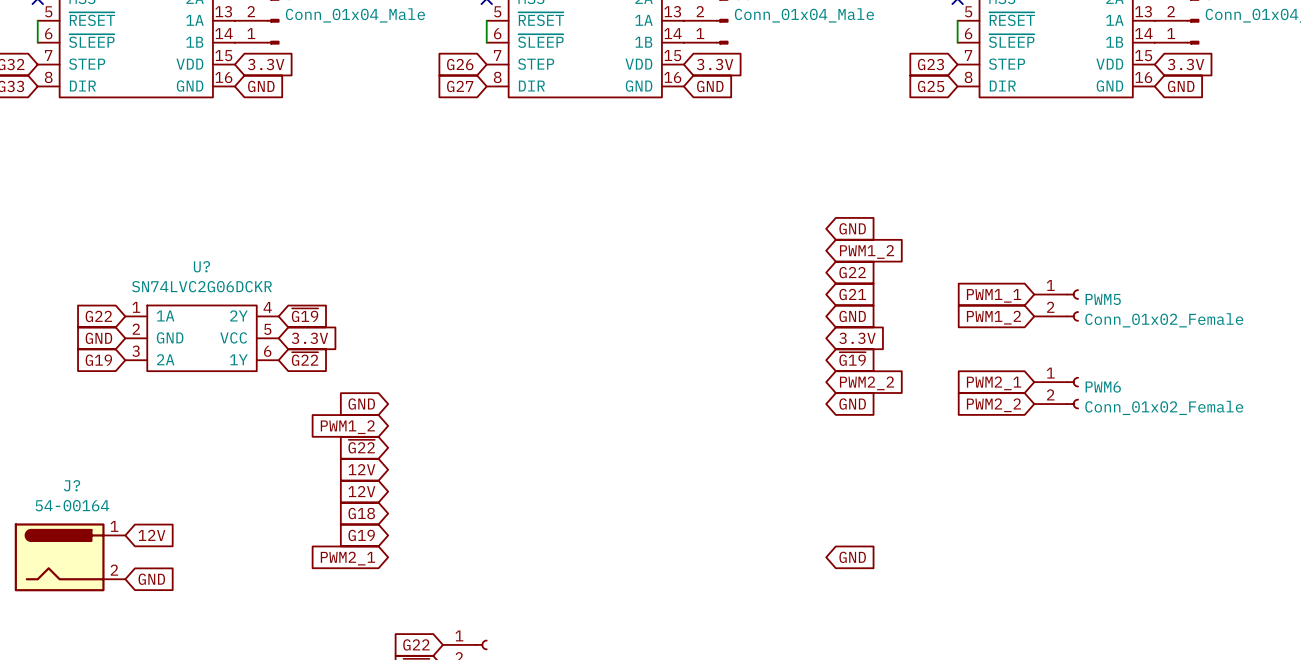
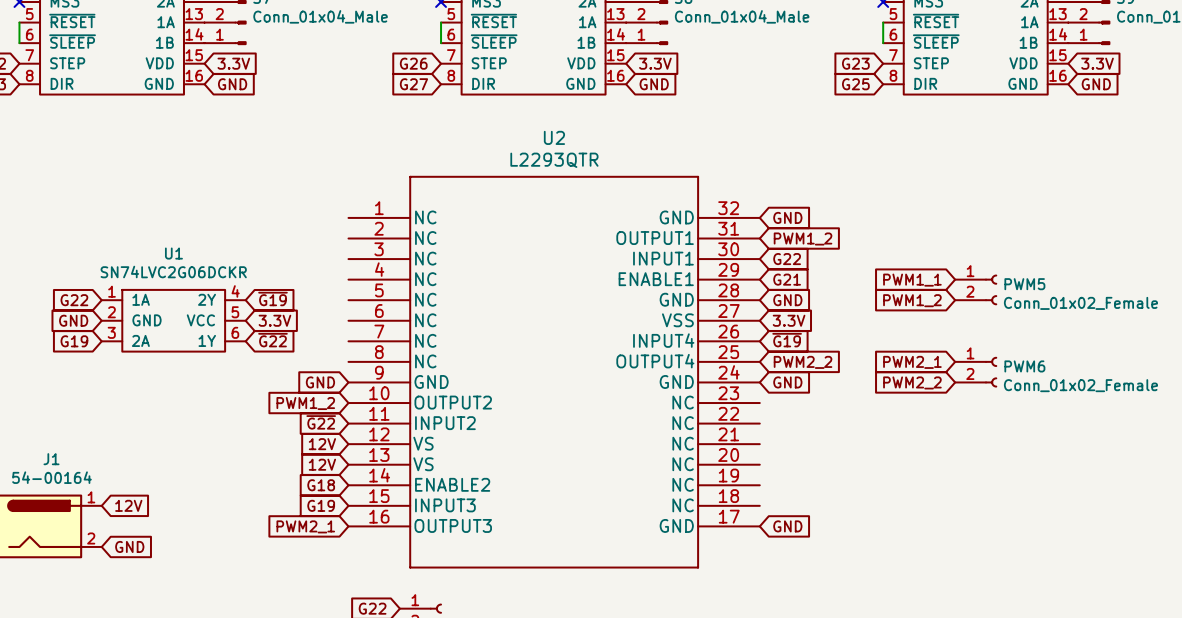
U? name: U? (201, 266) -> U1 (173, 253)
U2: none -> L2293QTR (554, 372)
J? name: J? (72, 485) -> J1 (51, 459)

